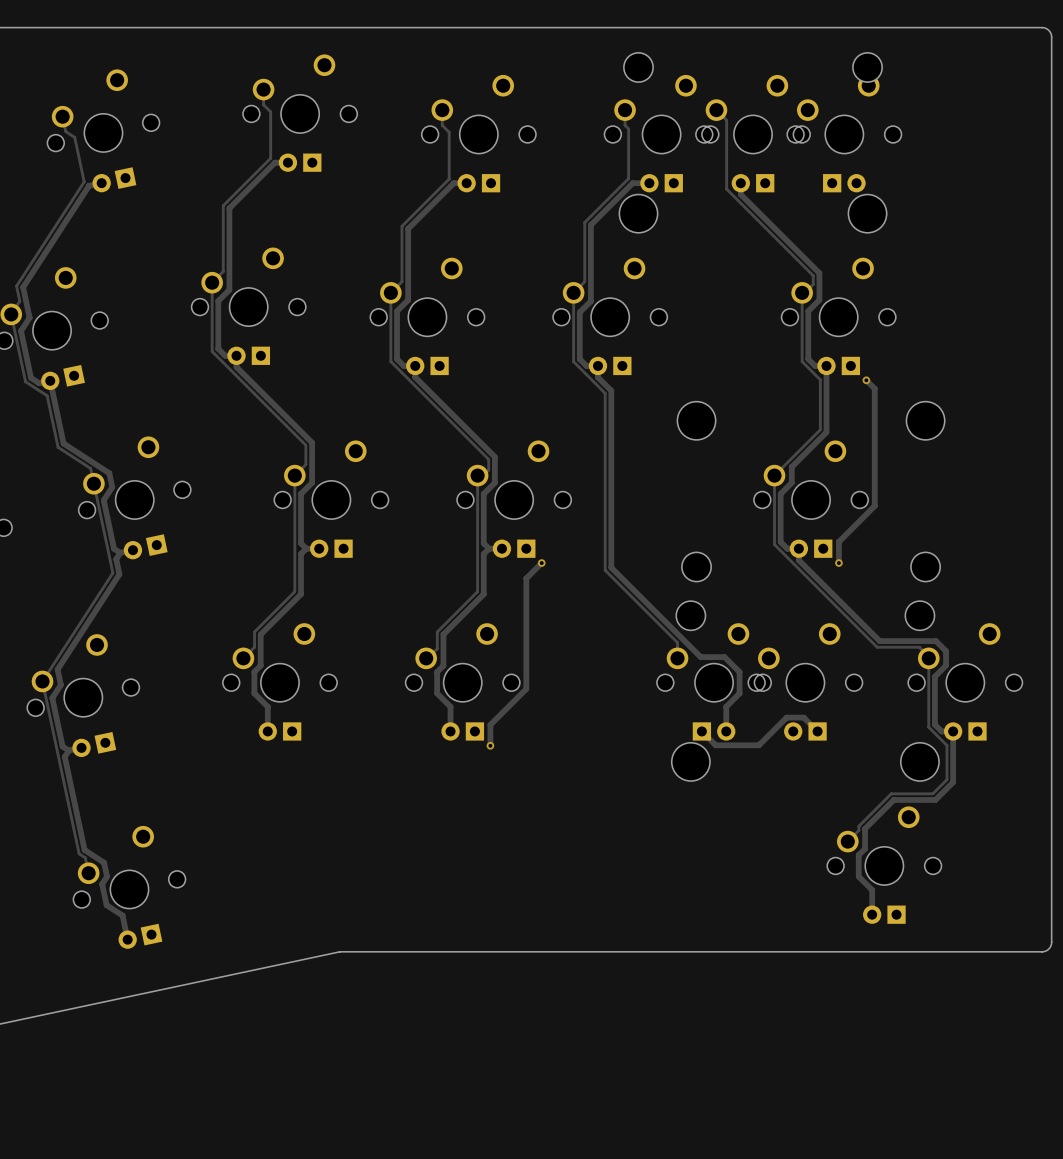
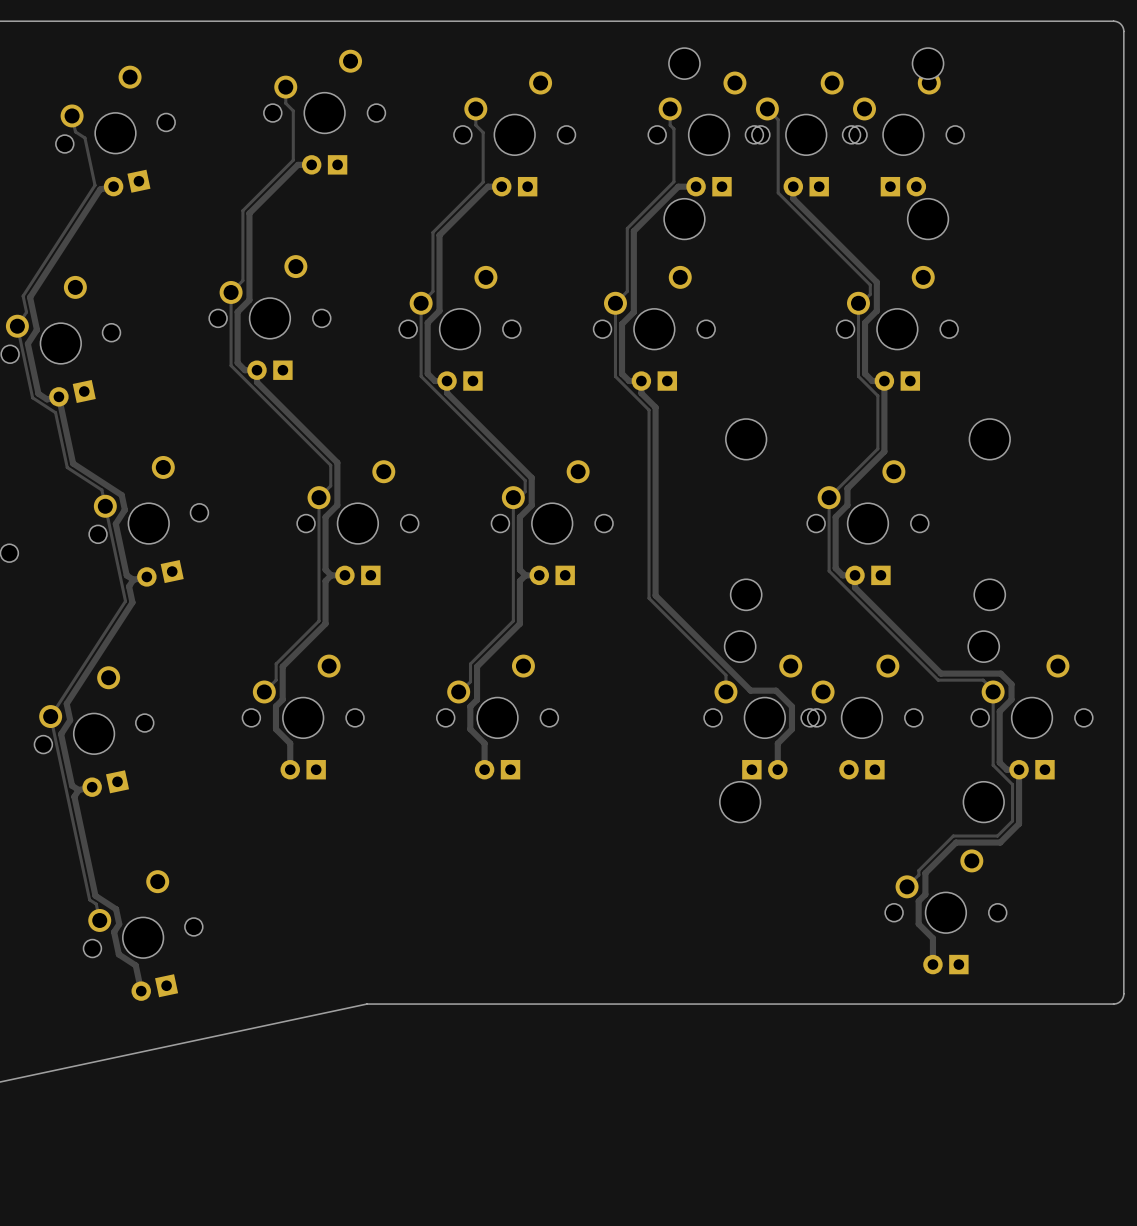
track: (866, 380) (874, 388) (874, 506) (838, 541) (838, 563) -> none
via: (866, 380) -> none
track: (541, 563) (526, 578) (526, 688) (490, 724) (490, 745) -> none
via: (541, 563) -> none
via: (838, 563) -> none
track: (701, 731) (715, 745) (758, 745) (786, 717) (803, 717) (817, 731) -> none
via: (490, 745) -> none

